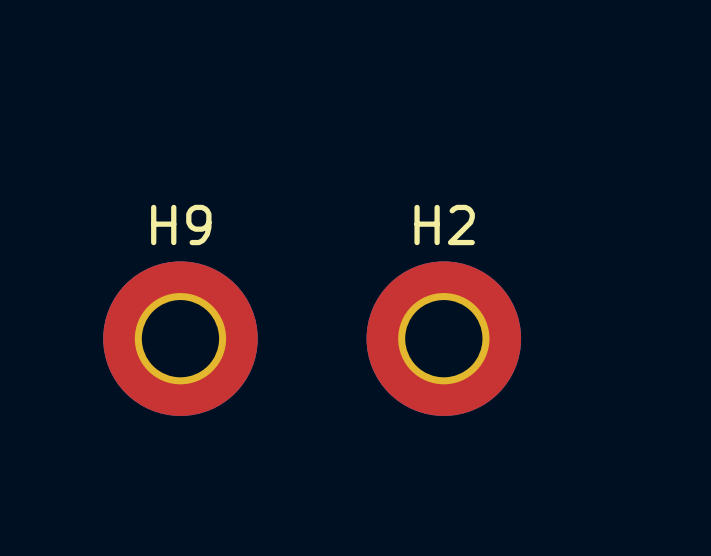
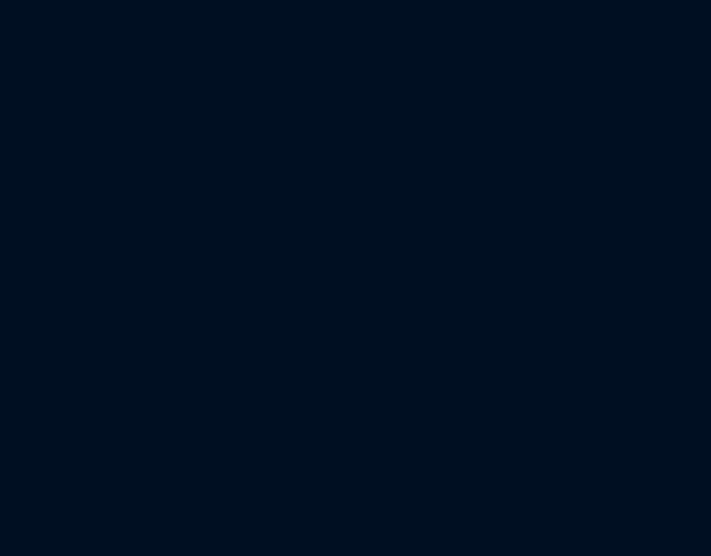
H9: (180, 338) -> none
H2: (443, 338) -> none

